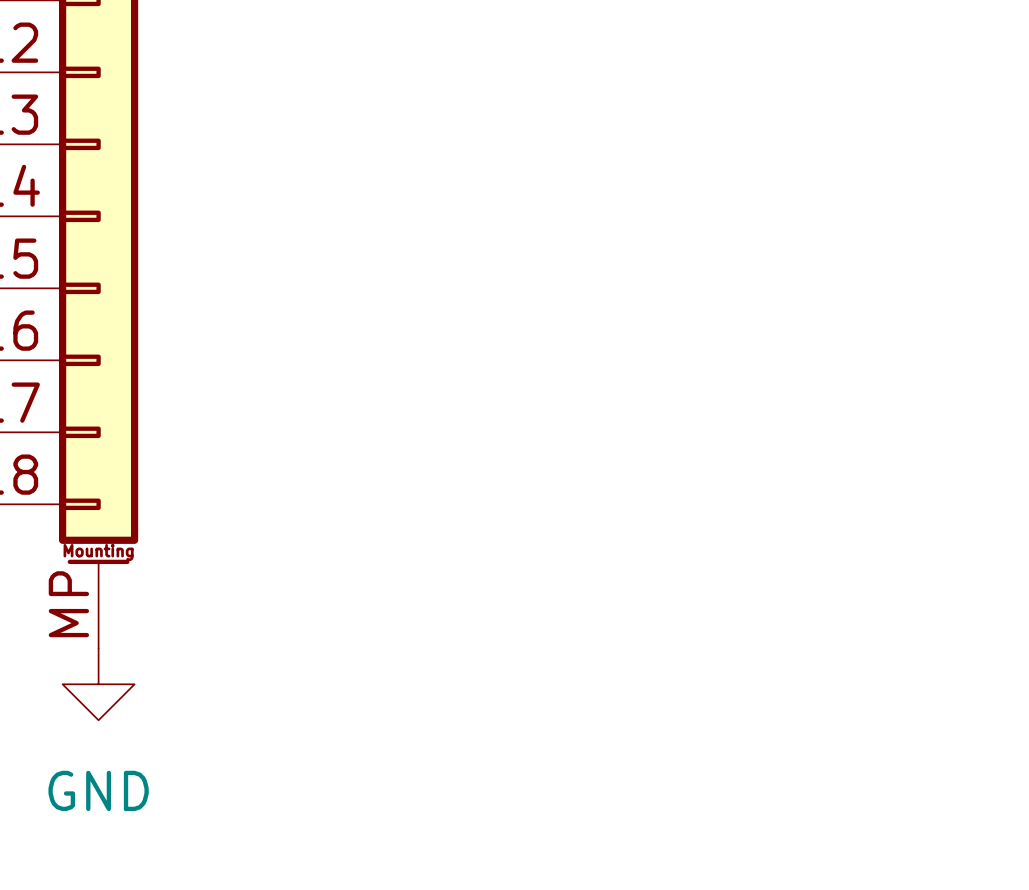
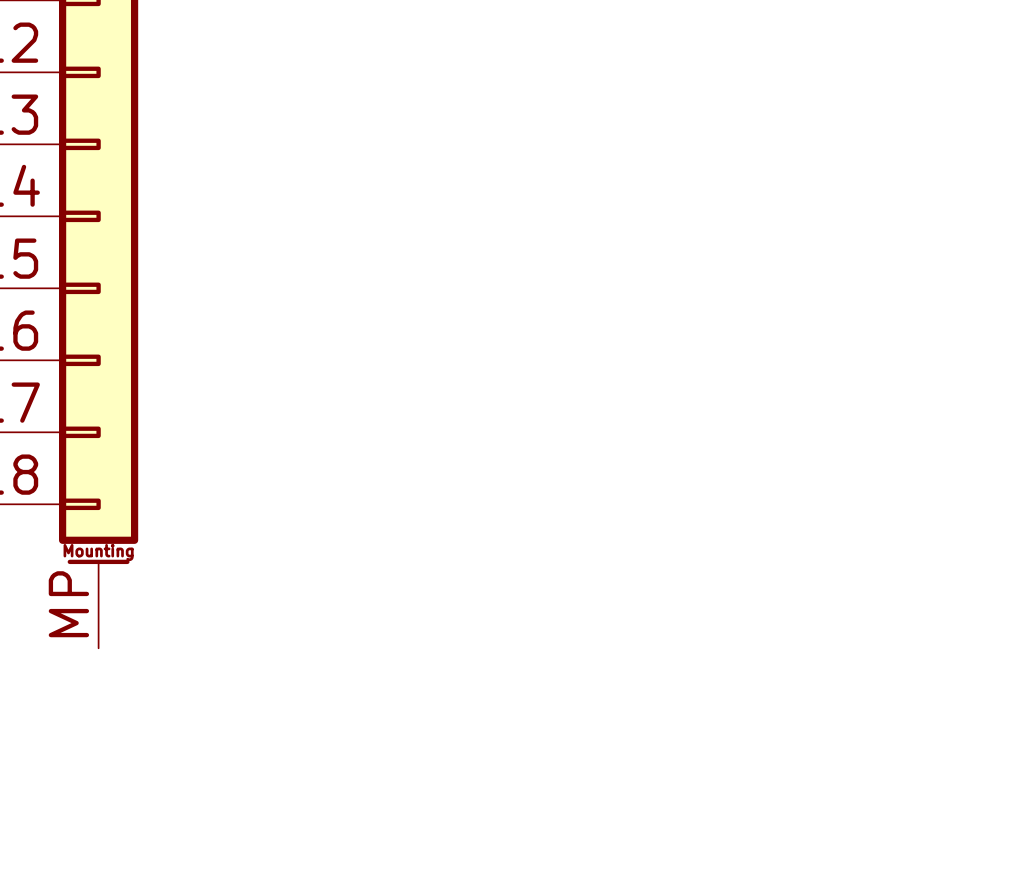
power symbol: GND (98, 684) -> none

